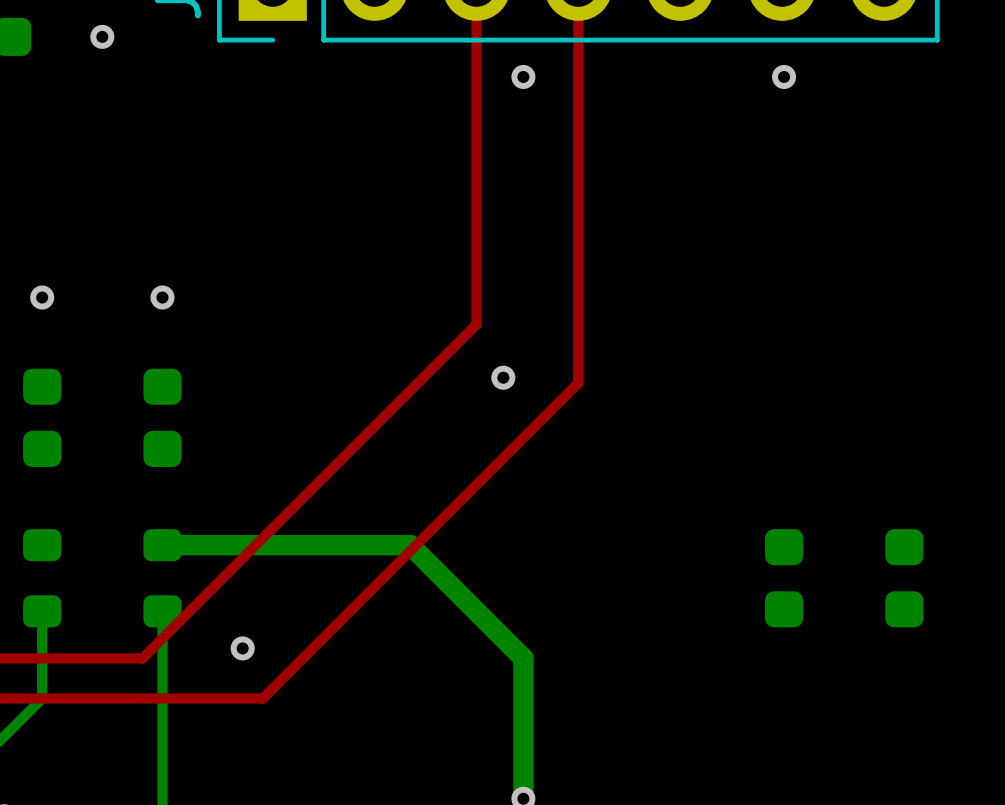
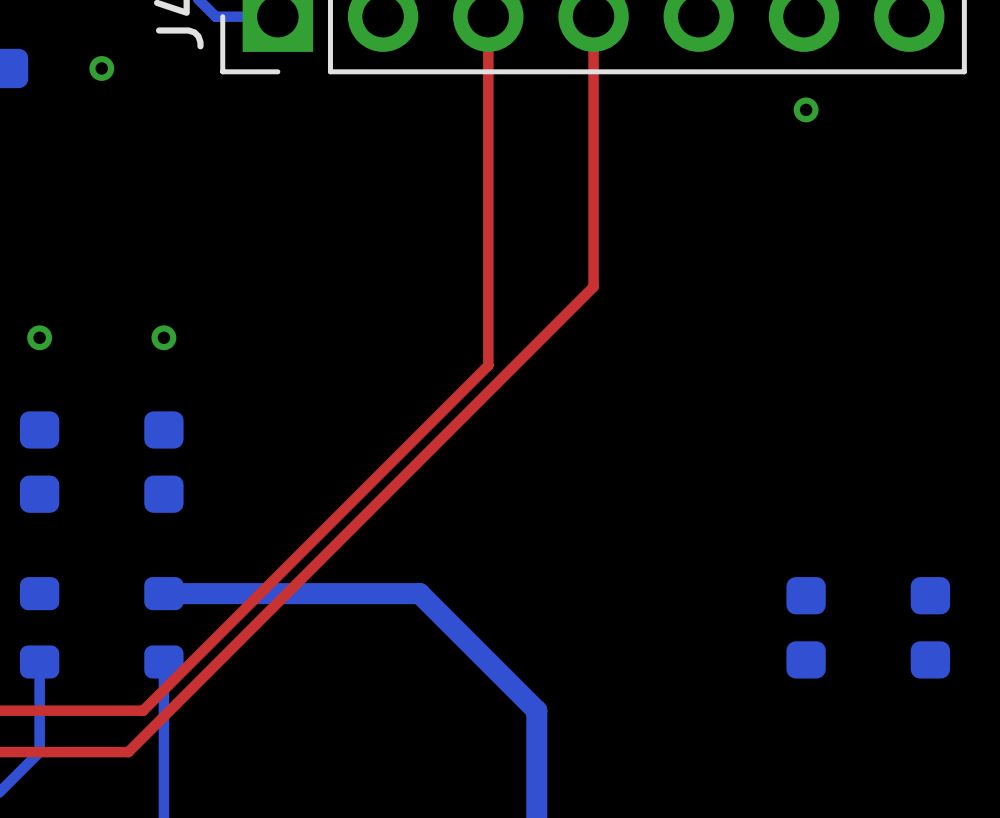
via: (523, 76) -> none
top track: (578, 248) (578, 382) (262, 698) (128, 698) -> (593, 286) (128, 752)
via: (503, 377) -> none
via: (242, 648) -> none

